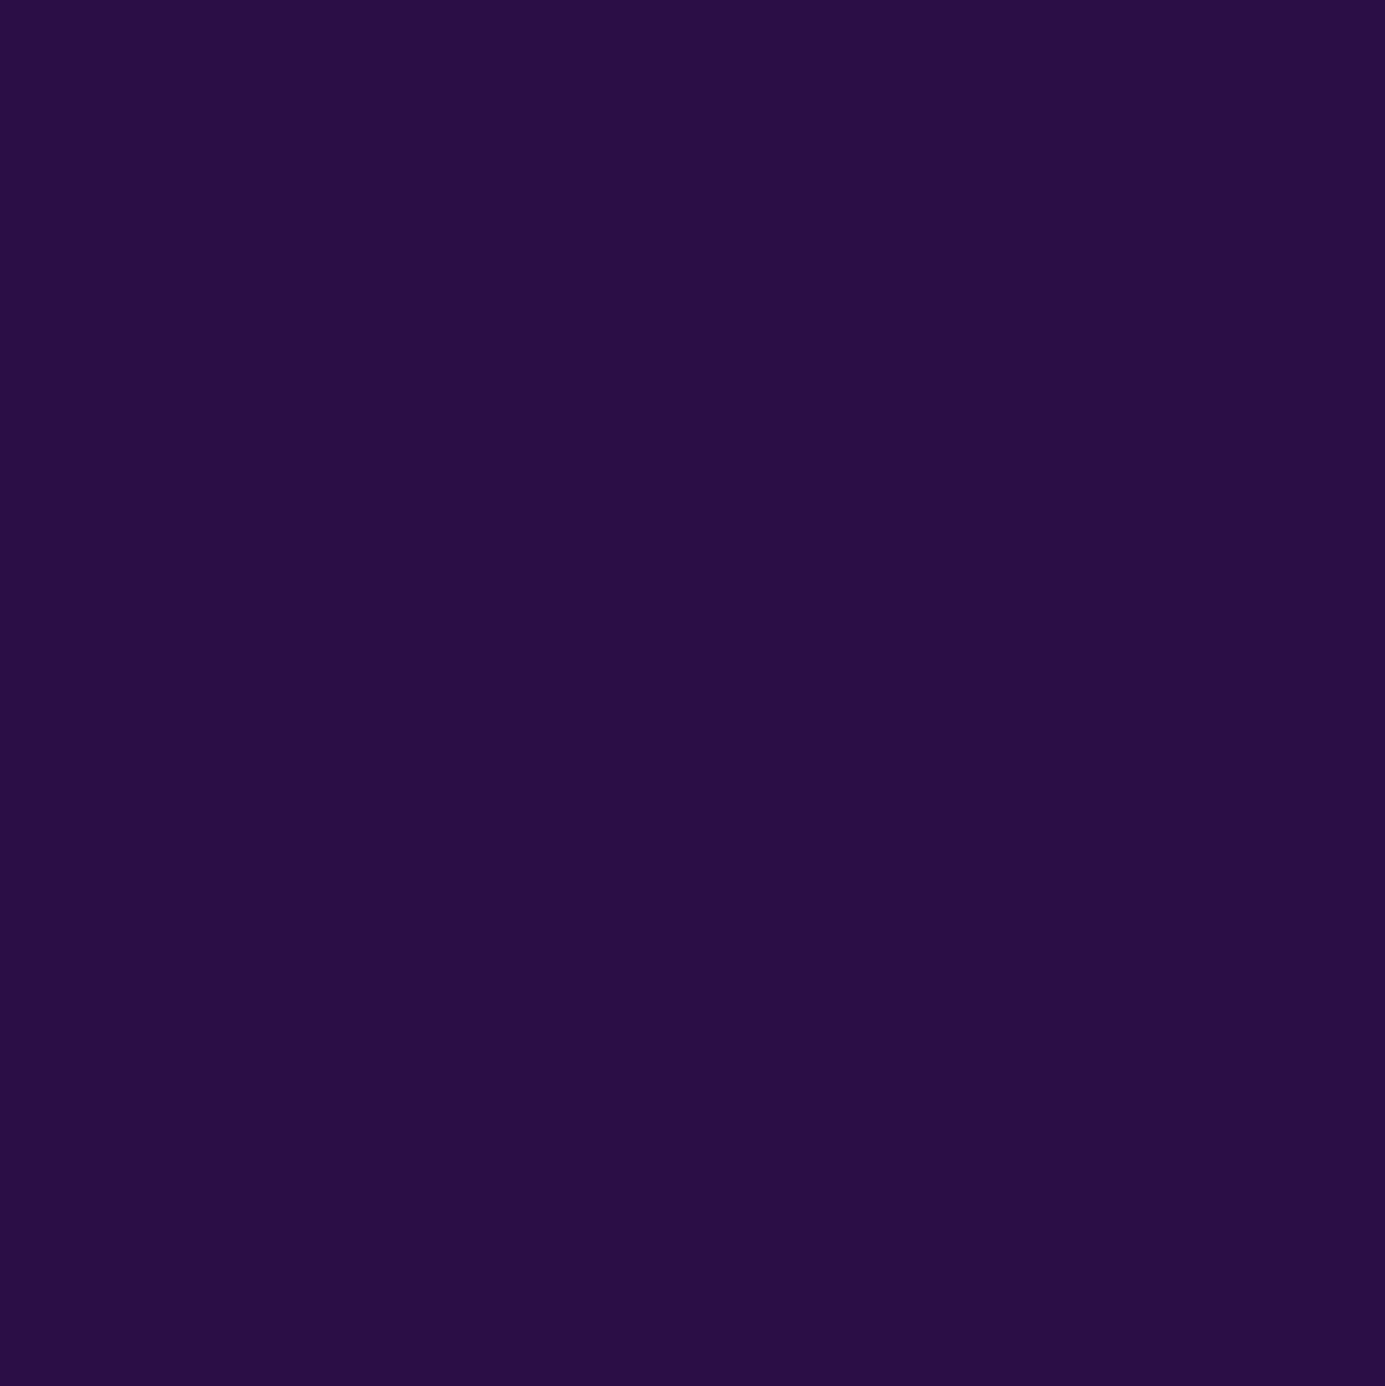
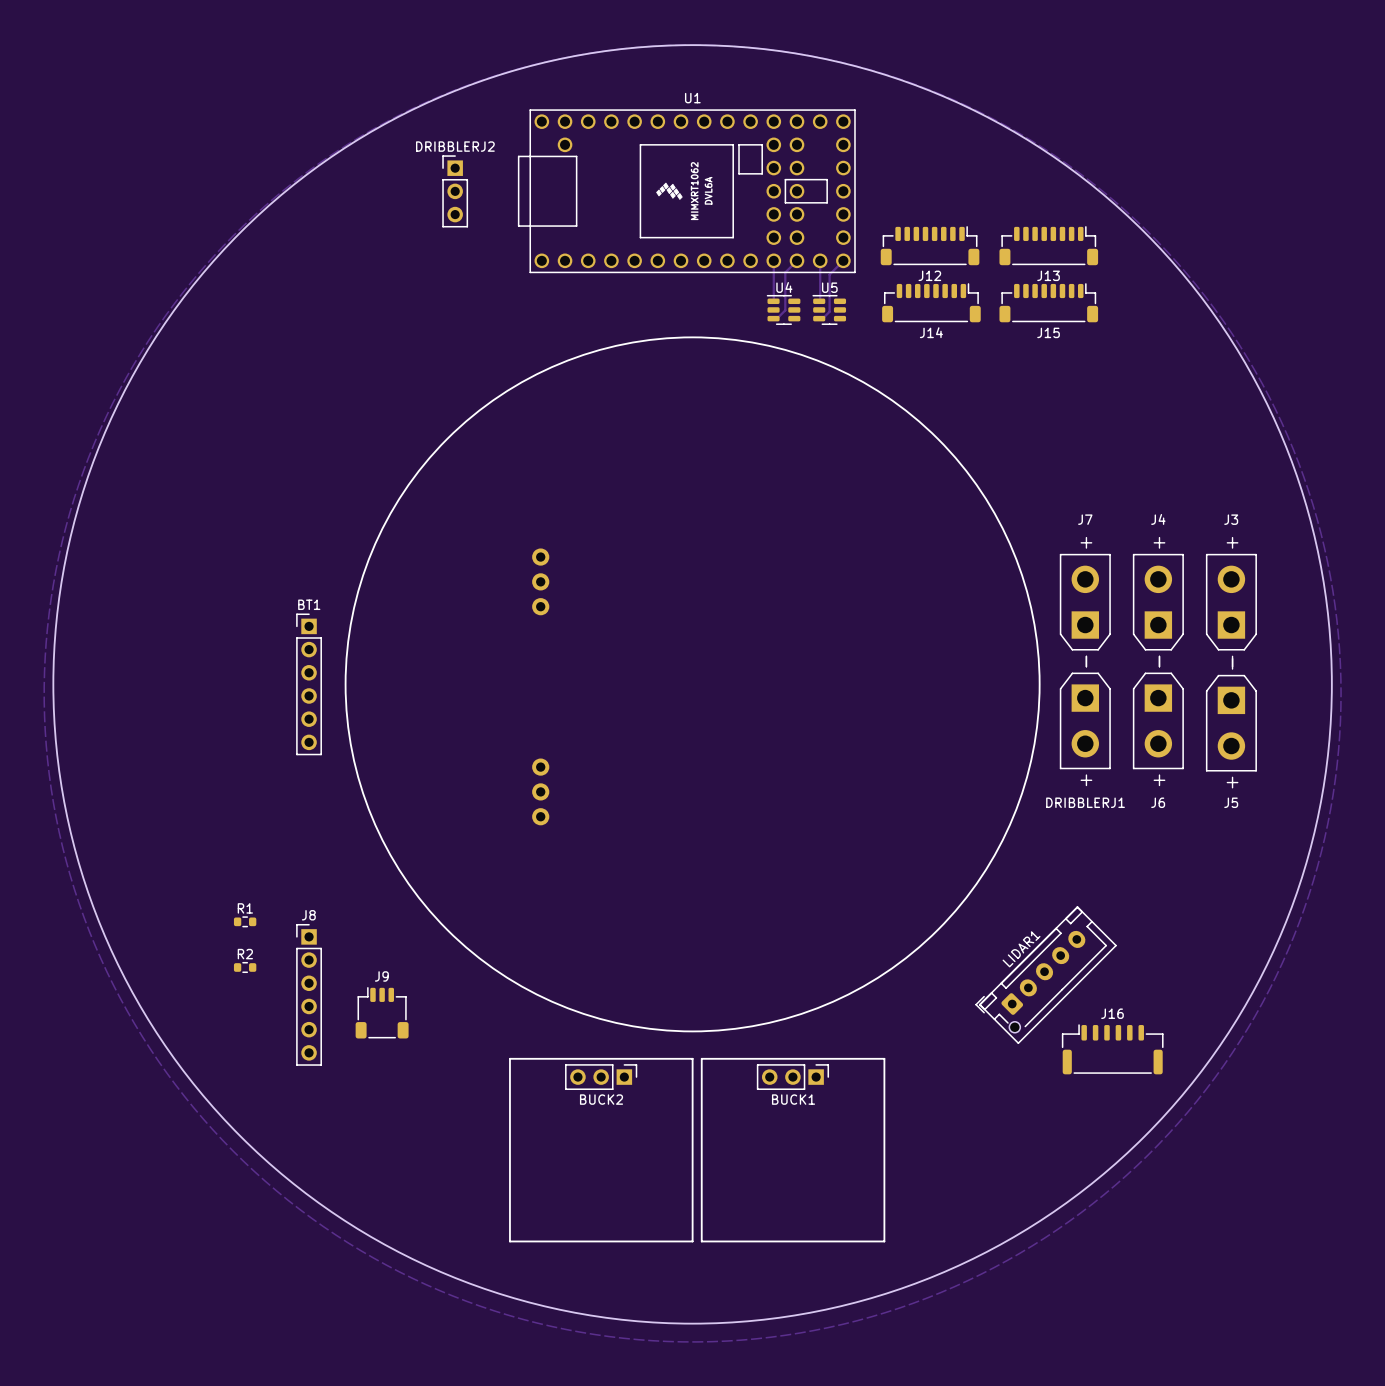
round board edge: none -> [52, 44, 1333, 1325]
zone outline: none -> (696, 45) (769, 49) (827, 59) (884, 74) (939, 94) (993, 118) (1056, 156) (1103, 191) (1147, 231) (1196, 285) (1231, 332) (1268, 396) (1293, 449) (1313, 505) (1327, 562) (1338, 634) (1341, 693) (1337, 765) (1327, 823) (1308, 894) (1288, 950) (1262, 1002) (1232, 1053) (1197, 1100) (1147, 1155) (1104, 1194) (1044, 1237) (994, 1267) (940, 1292) (871, 1316) (814, 1330) (741, 1340) (682, 1341) (623, 1338) (565, 1329) (494, 1310) (439, 1290) (373, 1257) (323, 1226) (276, 1190) (223, 1140) (175, 1084) (142, 1036) (113, 984) (89, 931) (70, 875) (56, 818) (47, 760) (44, 686) (47, 627) (56, 569) (69, 512) (94, 443) (126, 377) (157, 327) (192, 280) (242, 226) (287, 187) (334, 152) (385, 122) (451, 91) (507, 72) (564, 57) (637, 47) (696, 45)
DRIBBLERJ2: none -> (455, 191)
U1: none -> (686, 191)
J12: none -> (930, 245)
J13: none -> (1048, 245)
track: none -> (773, 260) (773, 301)
track: none -> (796, 260) (785, 272) (785, 310) (777, 318) (773, 318)
track: none -> (820, 260) (819, 301)
track: none -> (843, 260) (829, 274) (829, 311) (822, 318) (819, 318)
J14: none -> (931, 302)
J15: none -> (1048, 302)
U4: none -> (783, 309)
U5: none -> (829, 309)
drawing: none -> [344, 336, 1041, 1033]
part: none -> (540, 581)
J7: none -> (1085, 602)
J4: none -> (1158, 602)
J3: none -> (1231, 602)
BT1: none -> (309, 684)
DRIBBLERJ1: none -> (1085, 720)
J6: none -> (1158, 720)
J5: none -> (1231, 723)
part: none -> (540, 791)
R1: none -> (245, 921)
R2: none -> (245, 967)
LIDAR1: none -> (1046, 975)
J8: none -> (309, 994)
J9: none -> (382, 1012)
J16: none -> (1112, 1049)
line: none -> (509, 1058) (692, 1058) (692, 1241) (509, 1241) (509, 1058)
line: none -> (701, 1058) (884, 1058) (884, 1241) (701, 1241) (701, 1058)
BUCK2: none -> (601, 1077)
BUCK1: none -> (792, 1077)

